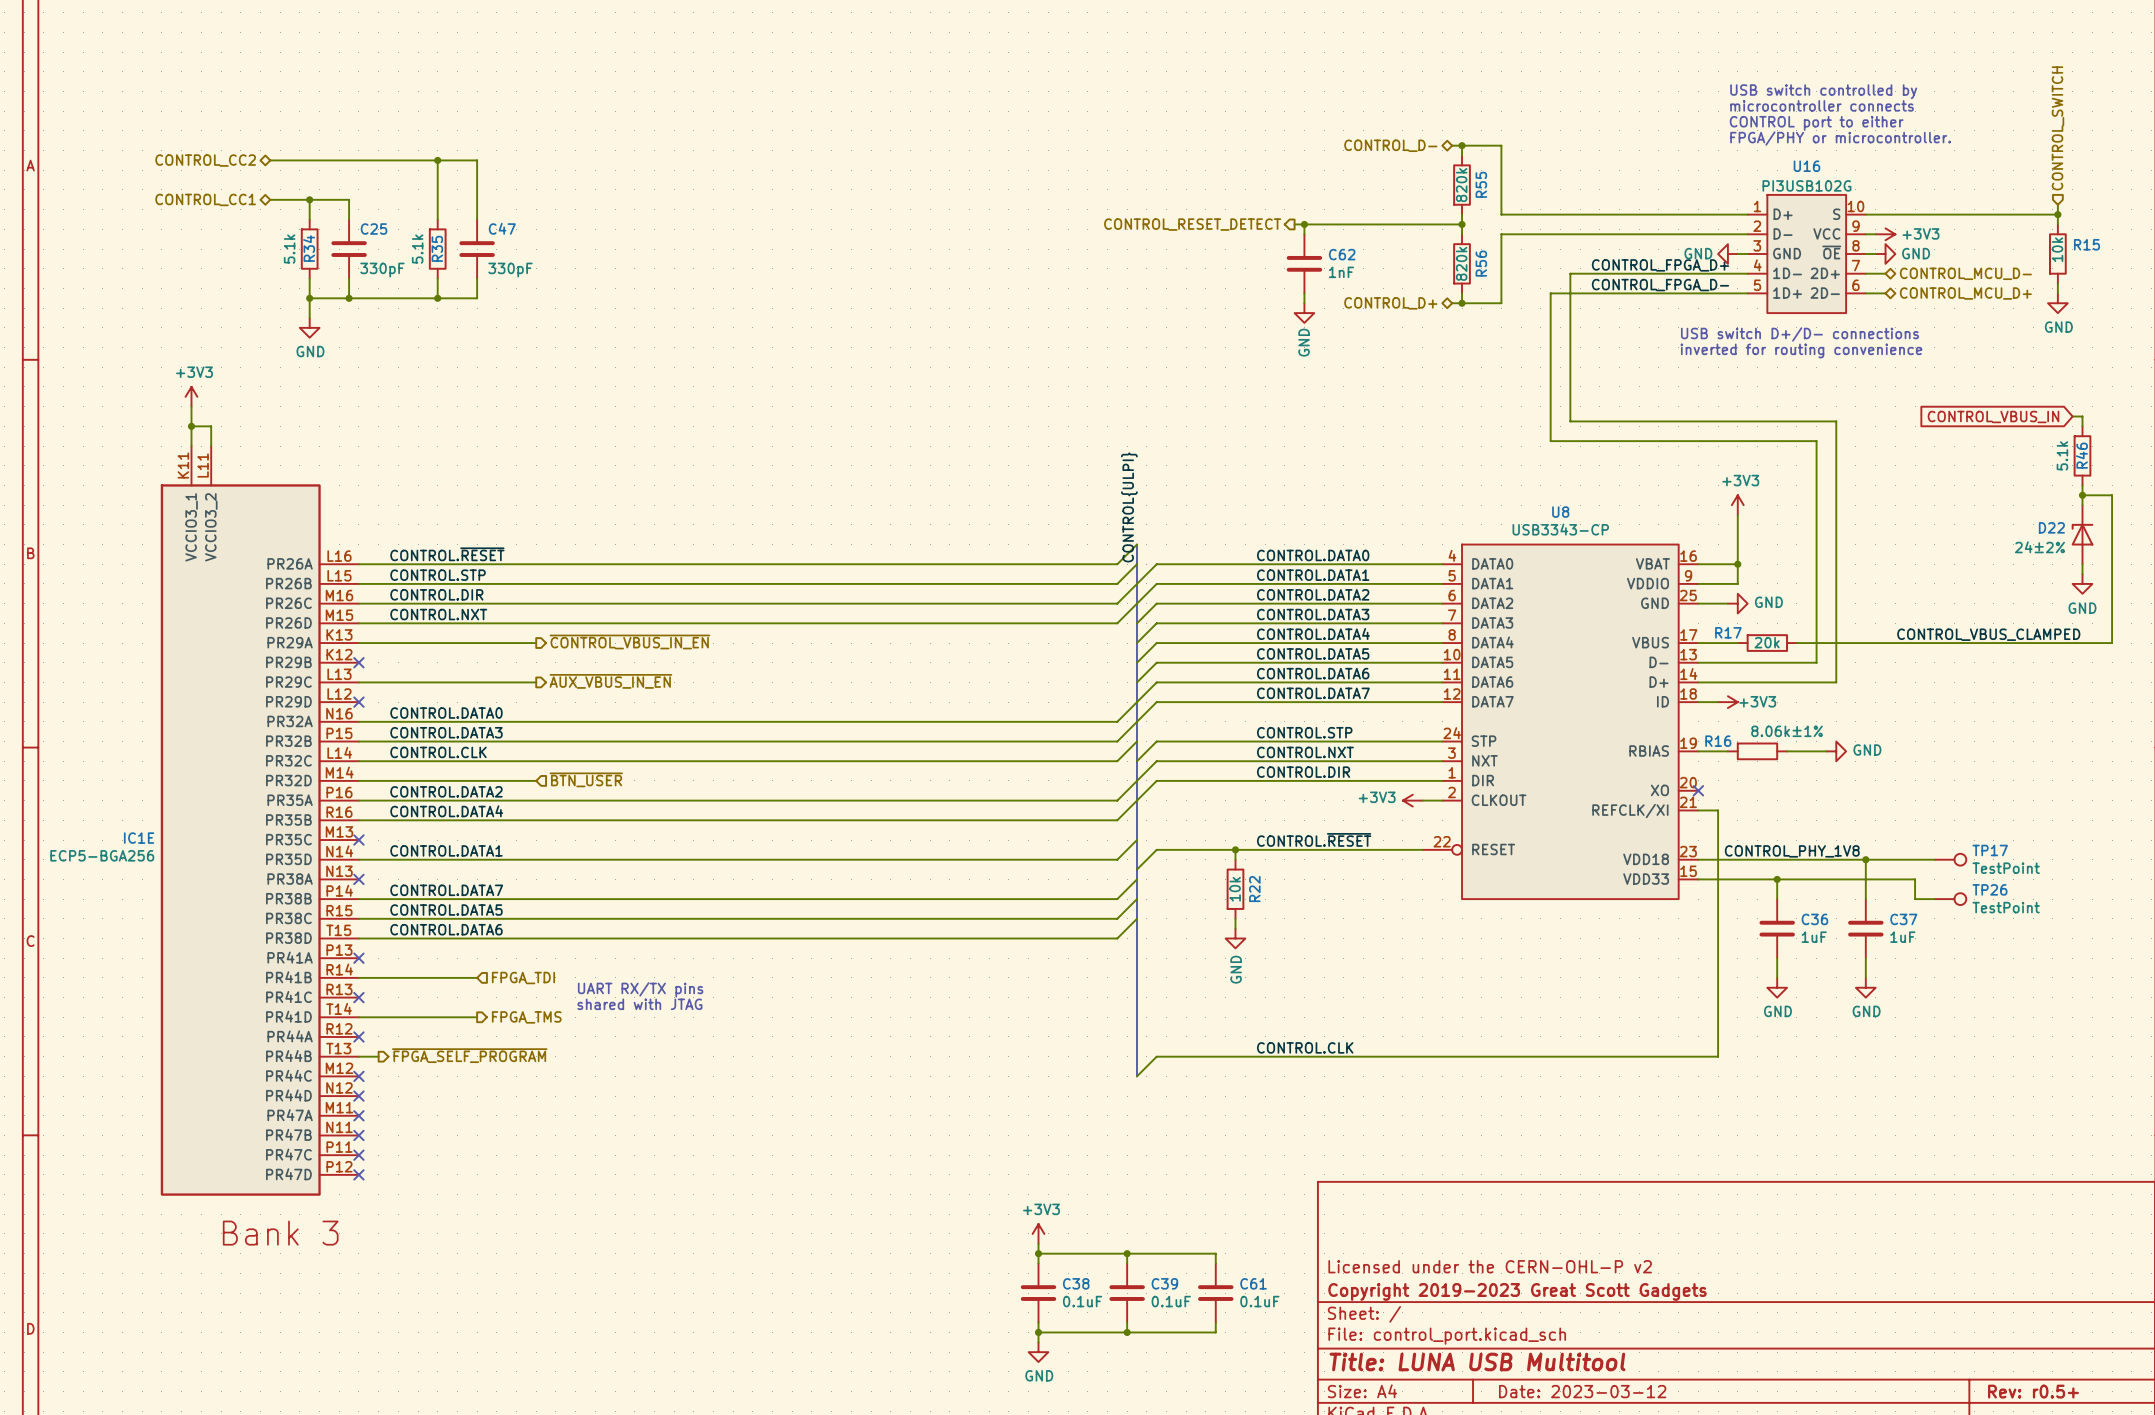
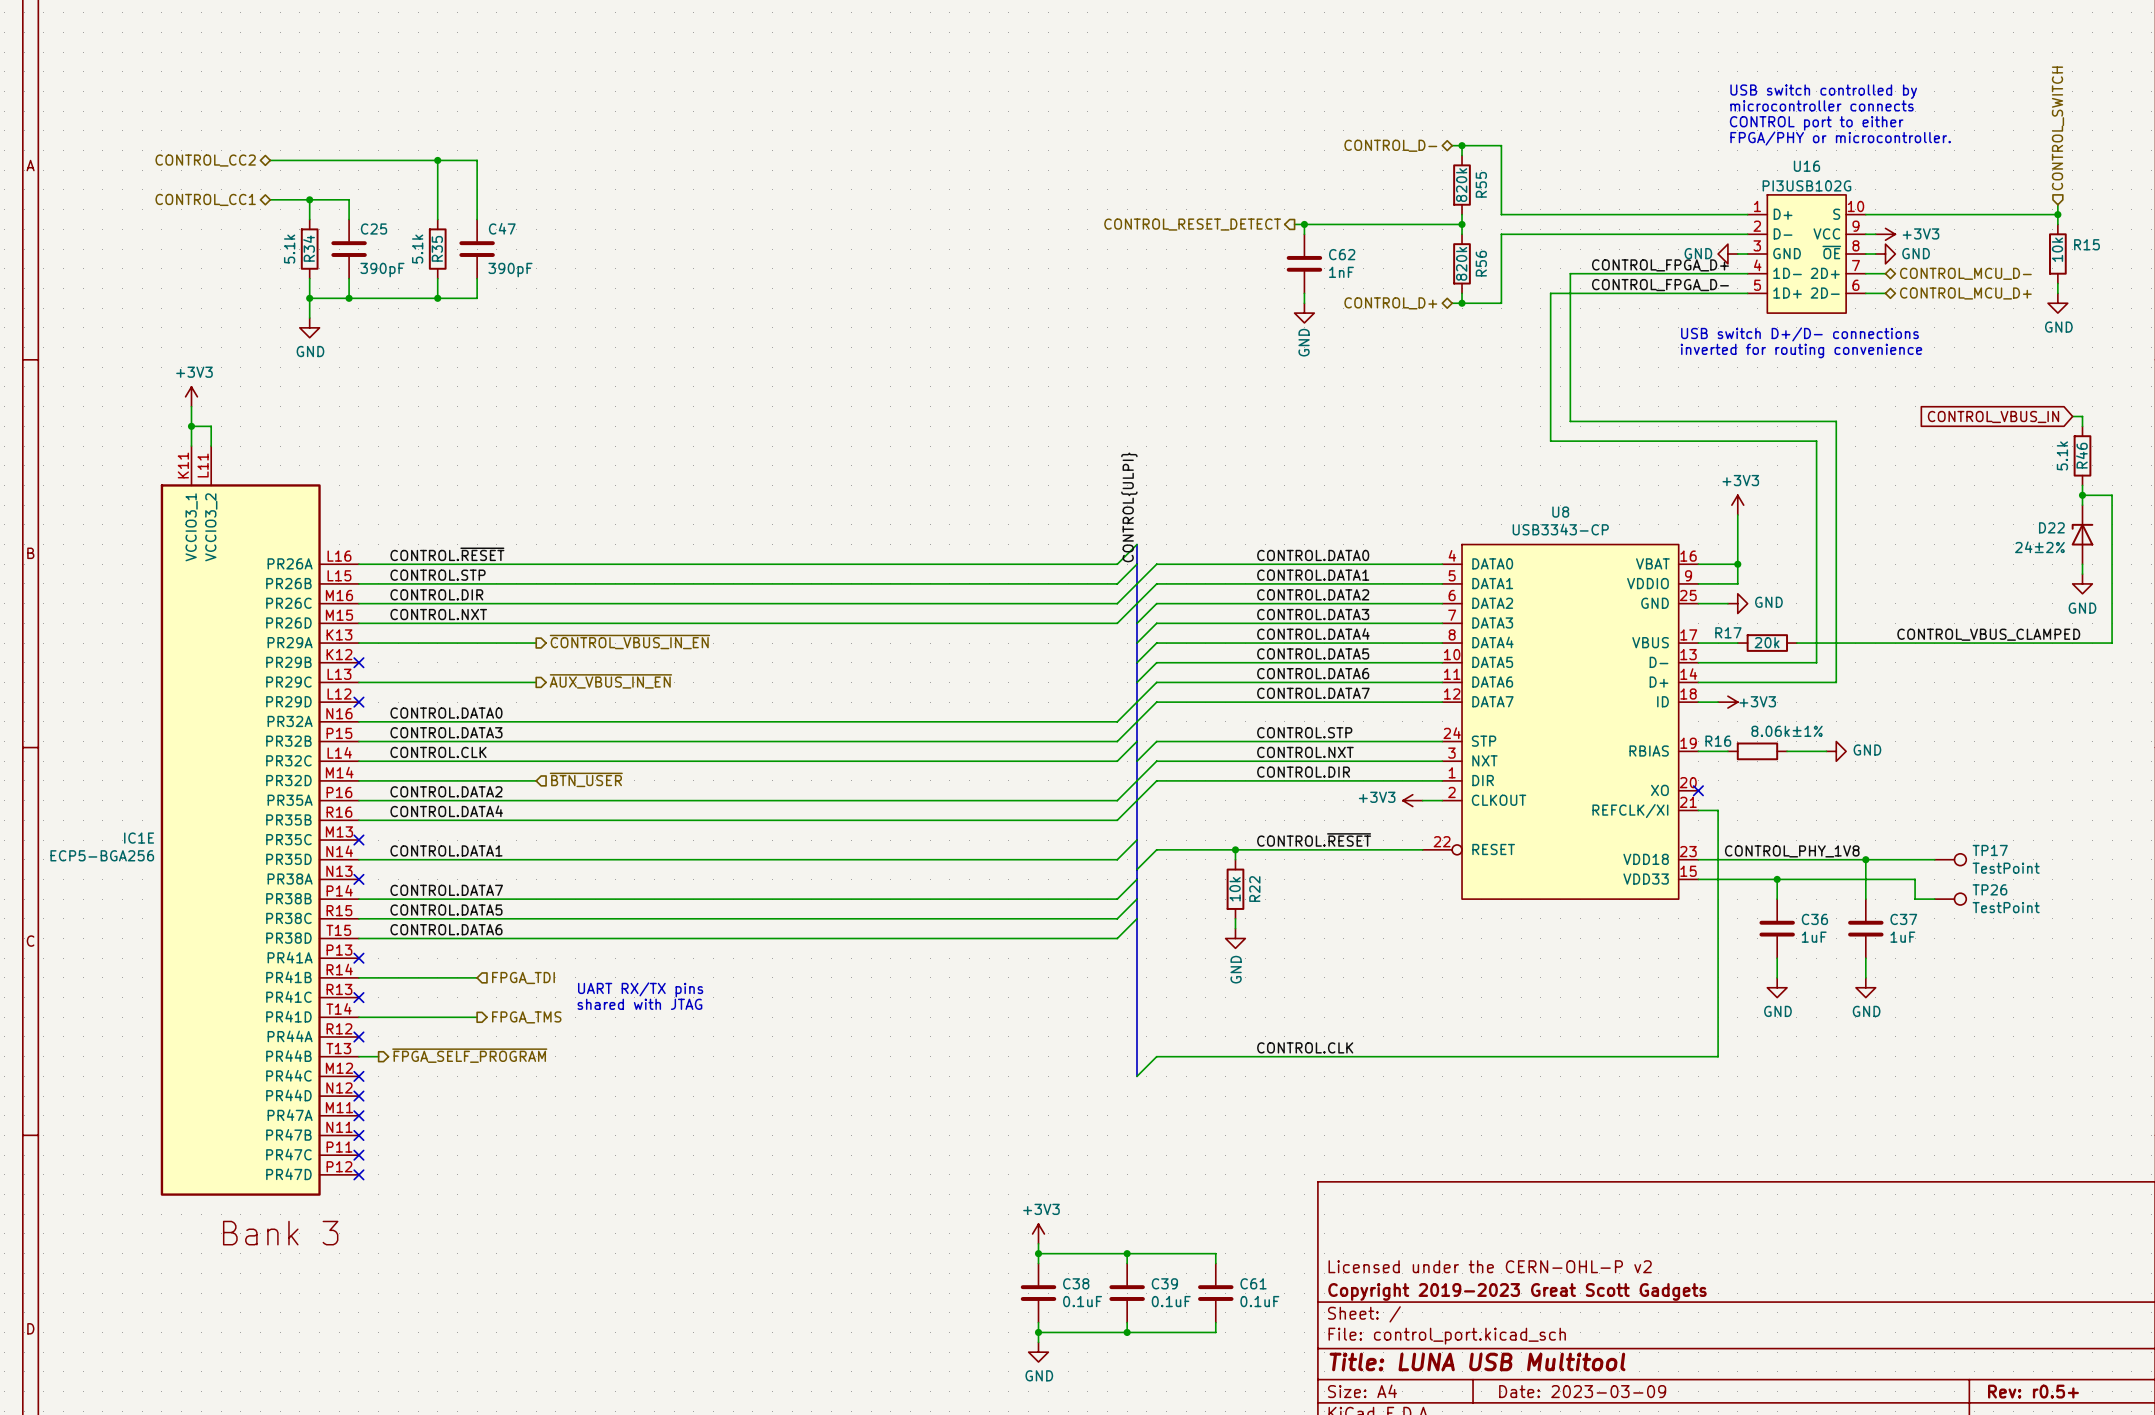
C25 value: 330pF (382, 270) -> 390pF (382, 270)
C47 value: 330pF (510, 270) -> 390pF (510, 270)
title block: Date: 2023-03-12 (1582, 1391) -> Date: 2023-03-09 (1582, 1391)

